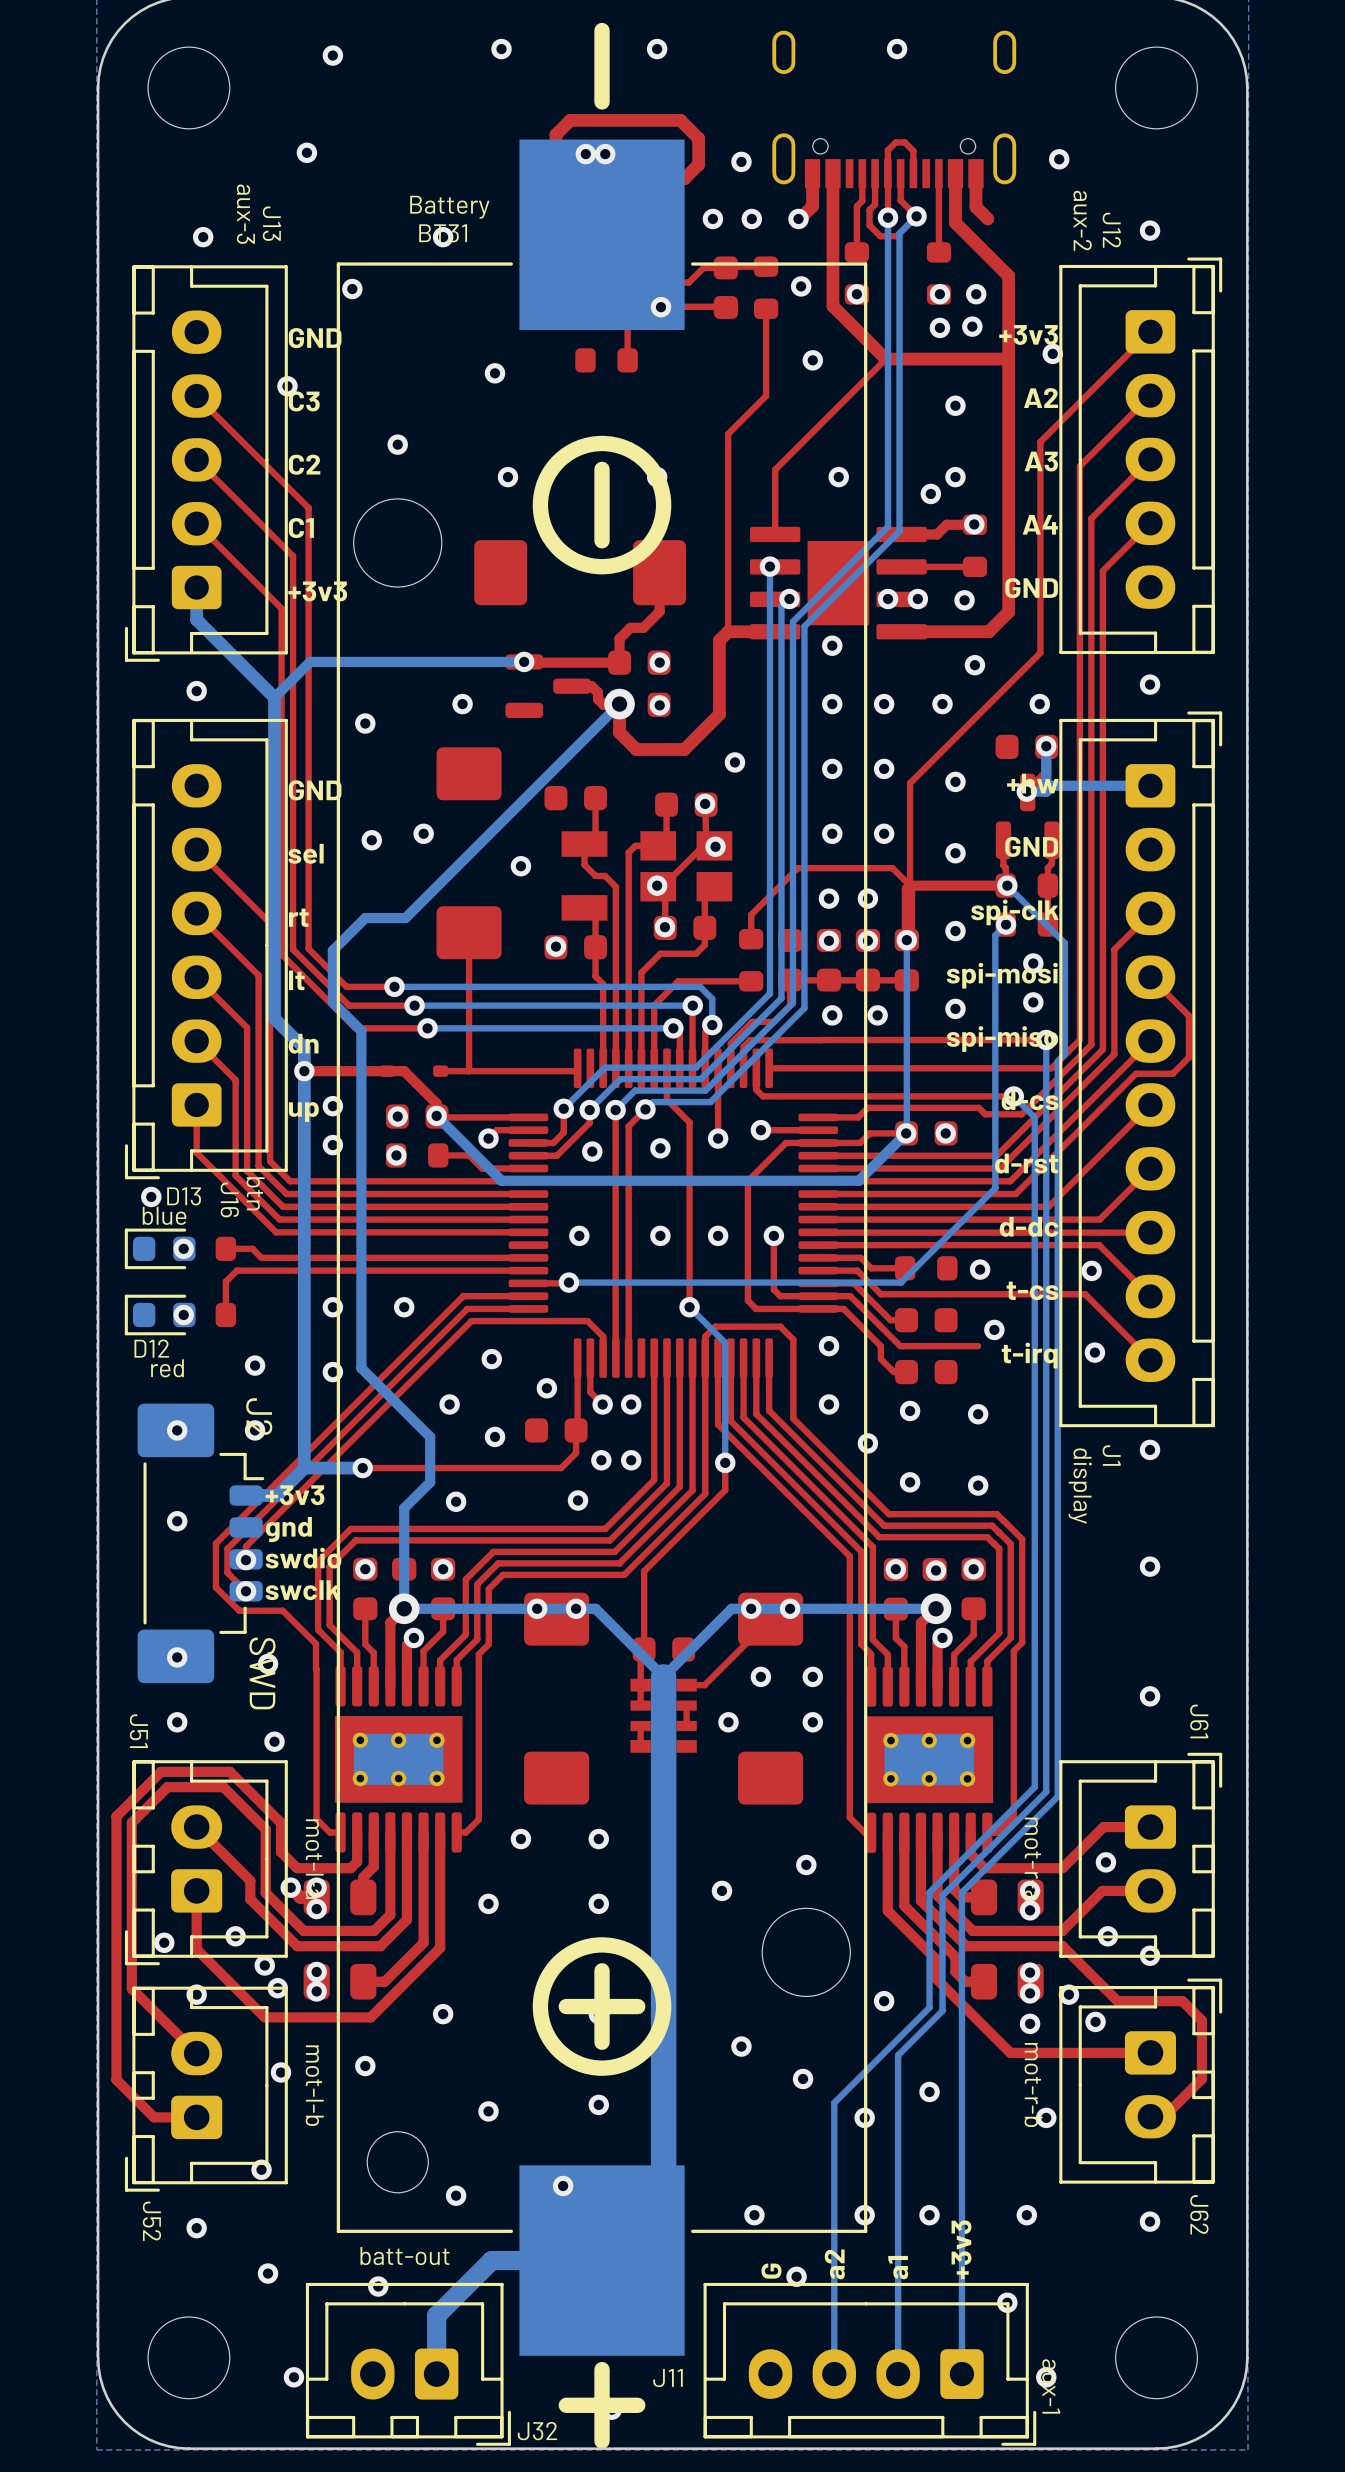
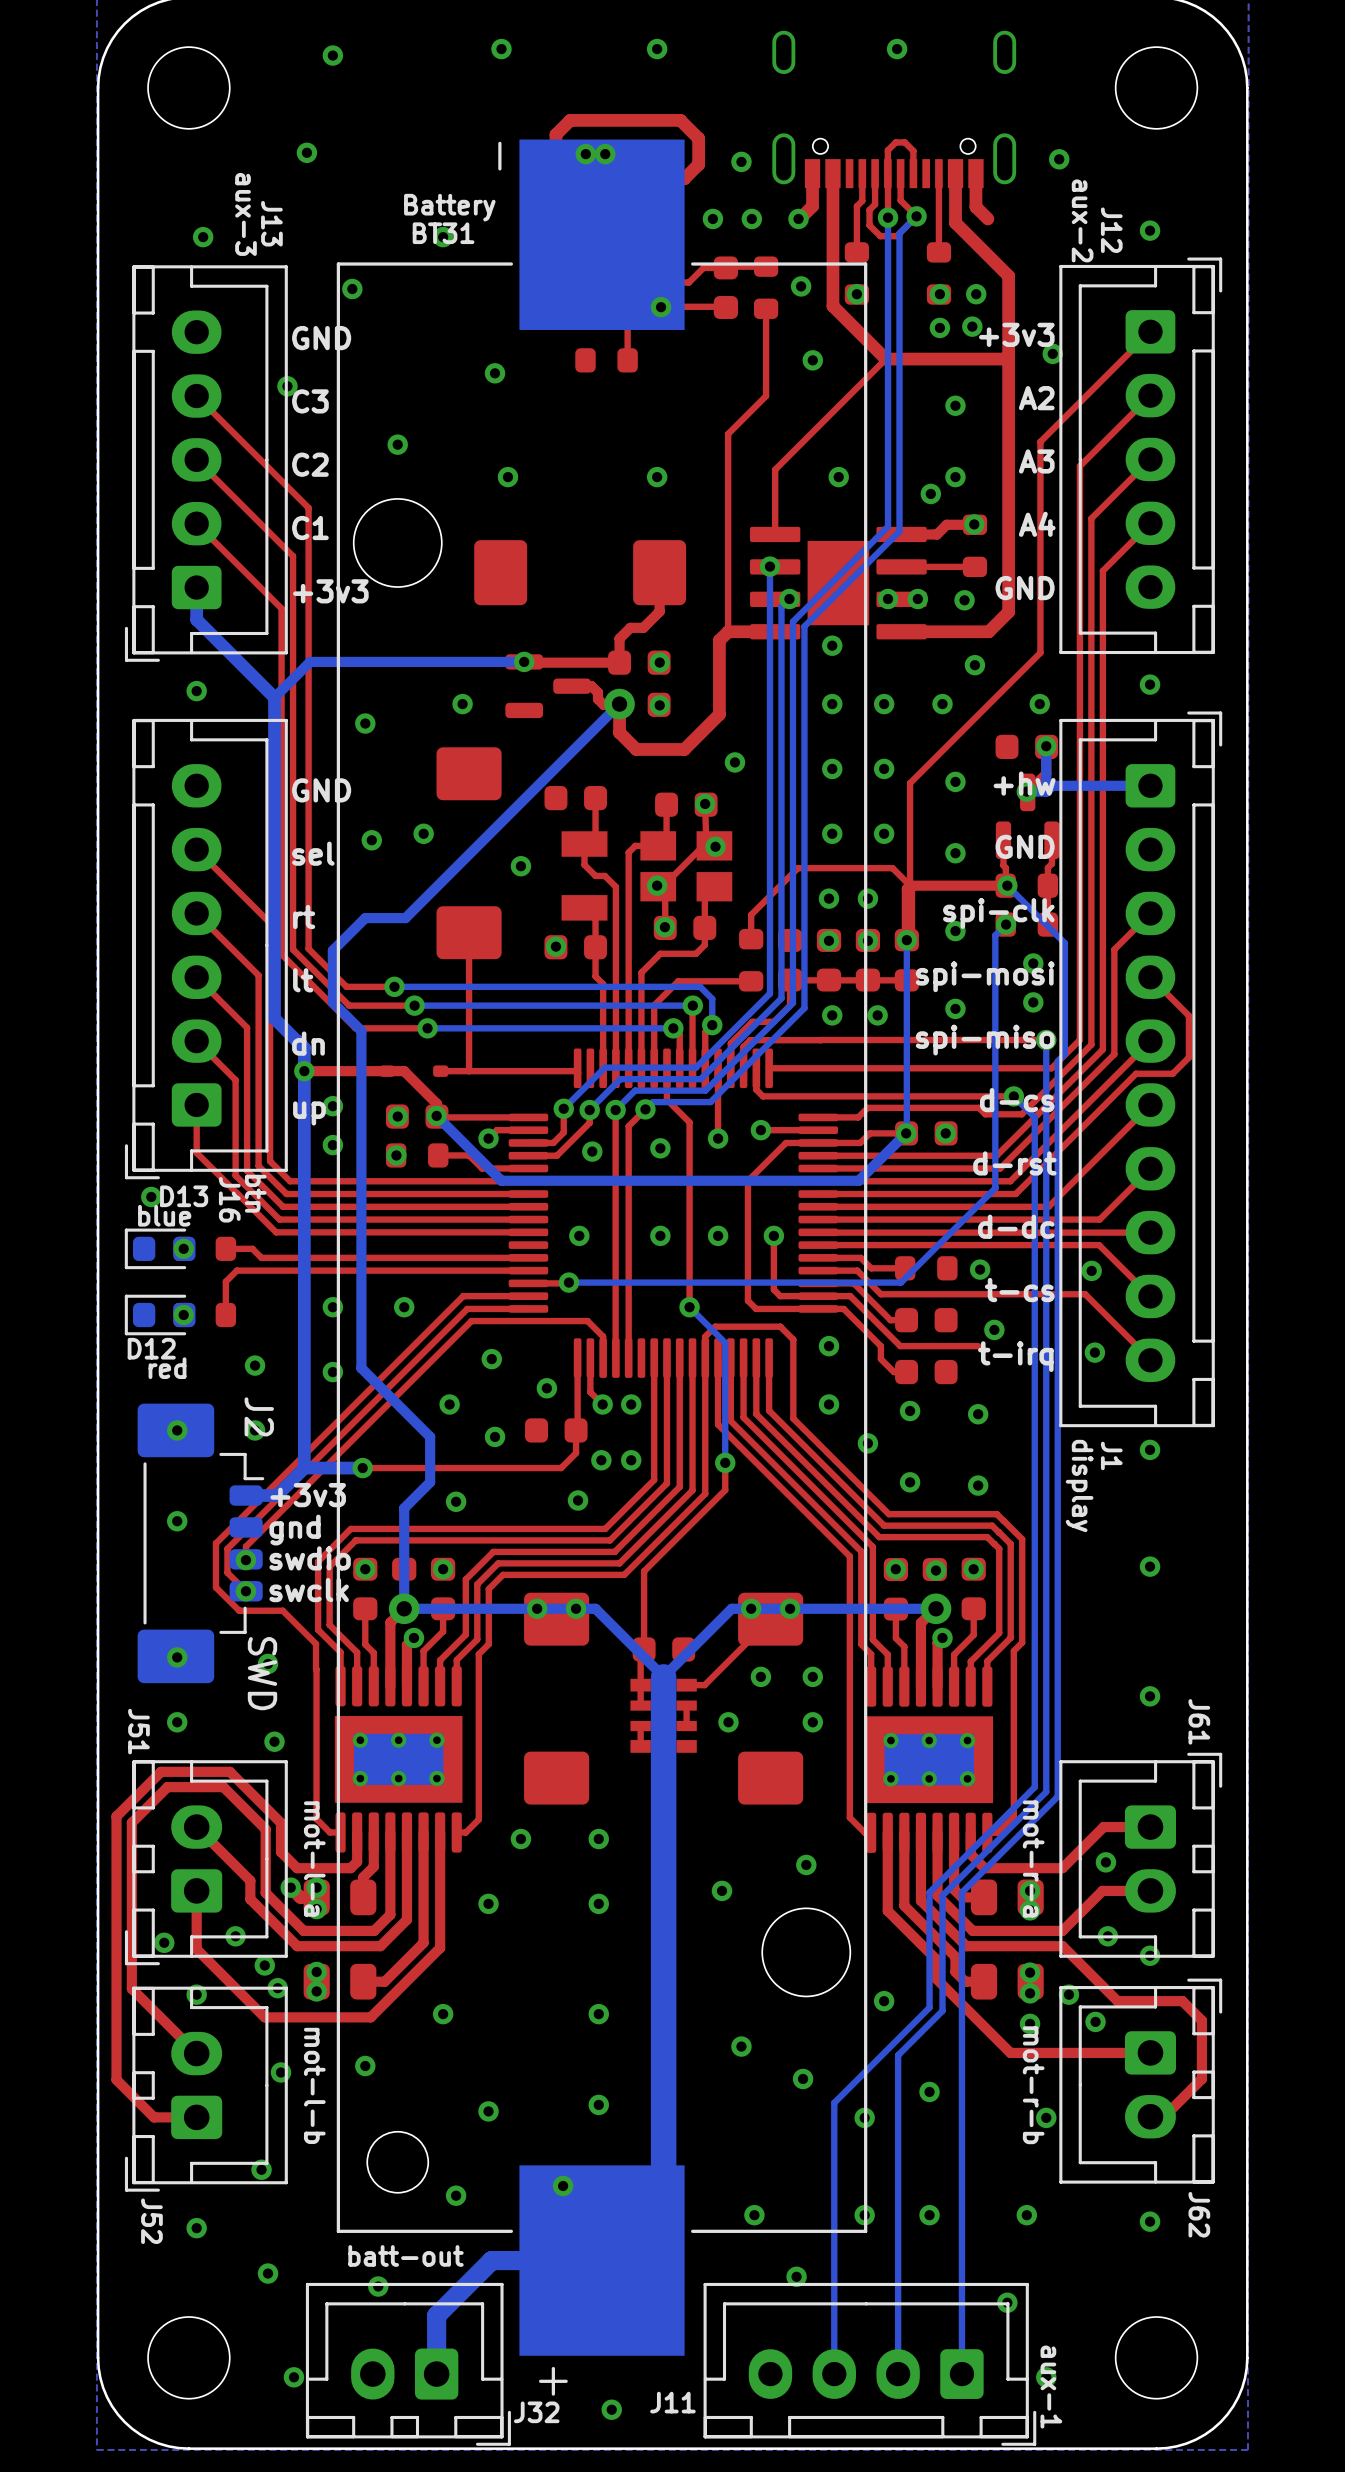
BT31 footprint: [336, 22, 868, 2449] -> [336, 139, 868, 2396]
text: +3v3 (961, 2249) -> none
text: a2 (834, 2264) -> none
text: a1 (898, 2267) -> none
text: G (771, 2271) -> none
J11 name position: J11 (668, 2378) -> J11 (672, 2402)
J32 name position: J32 (537, 2431) -> J32 (536, 2412)

